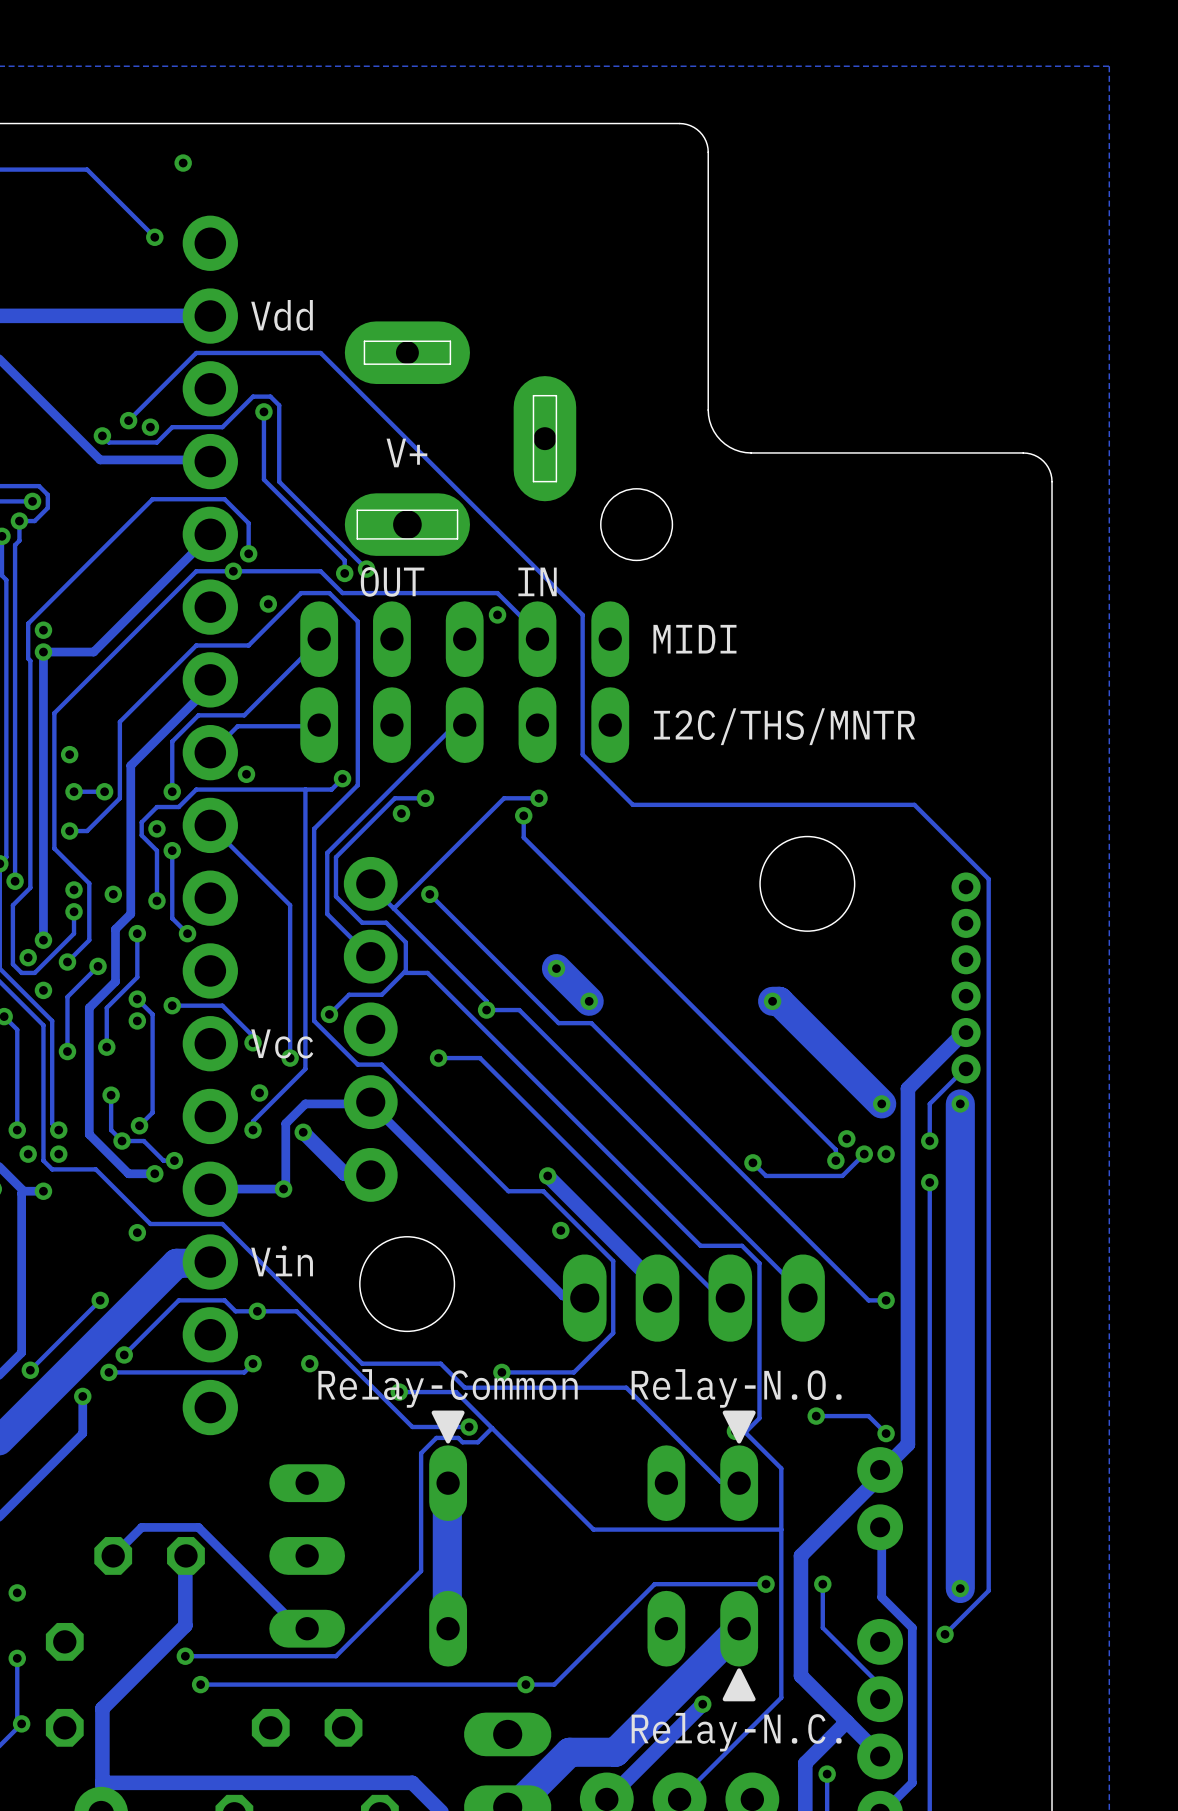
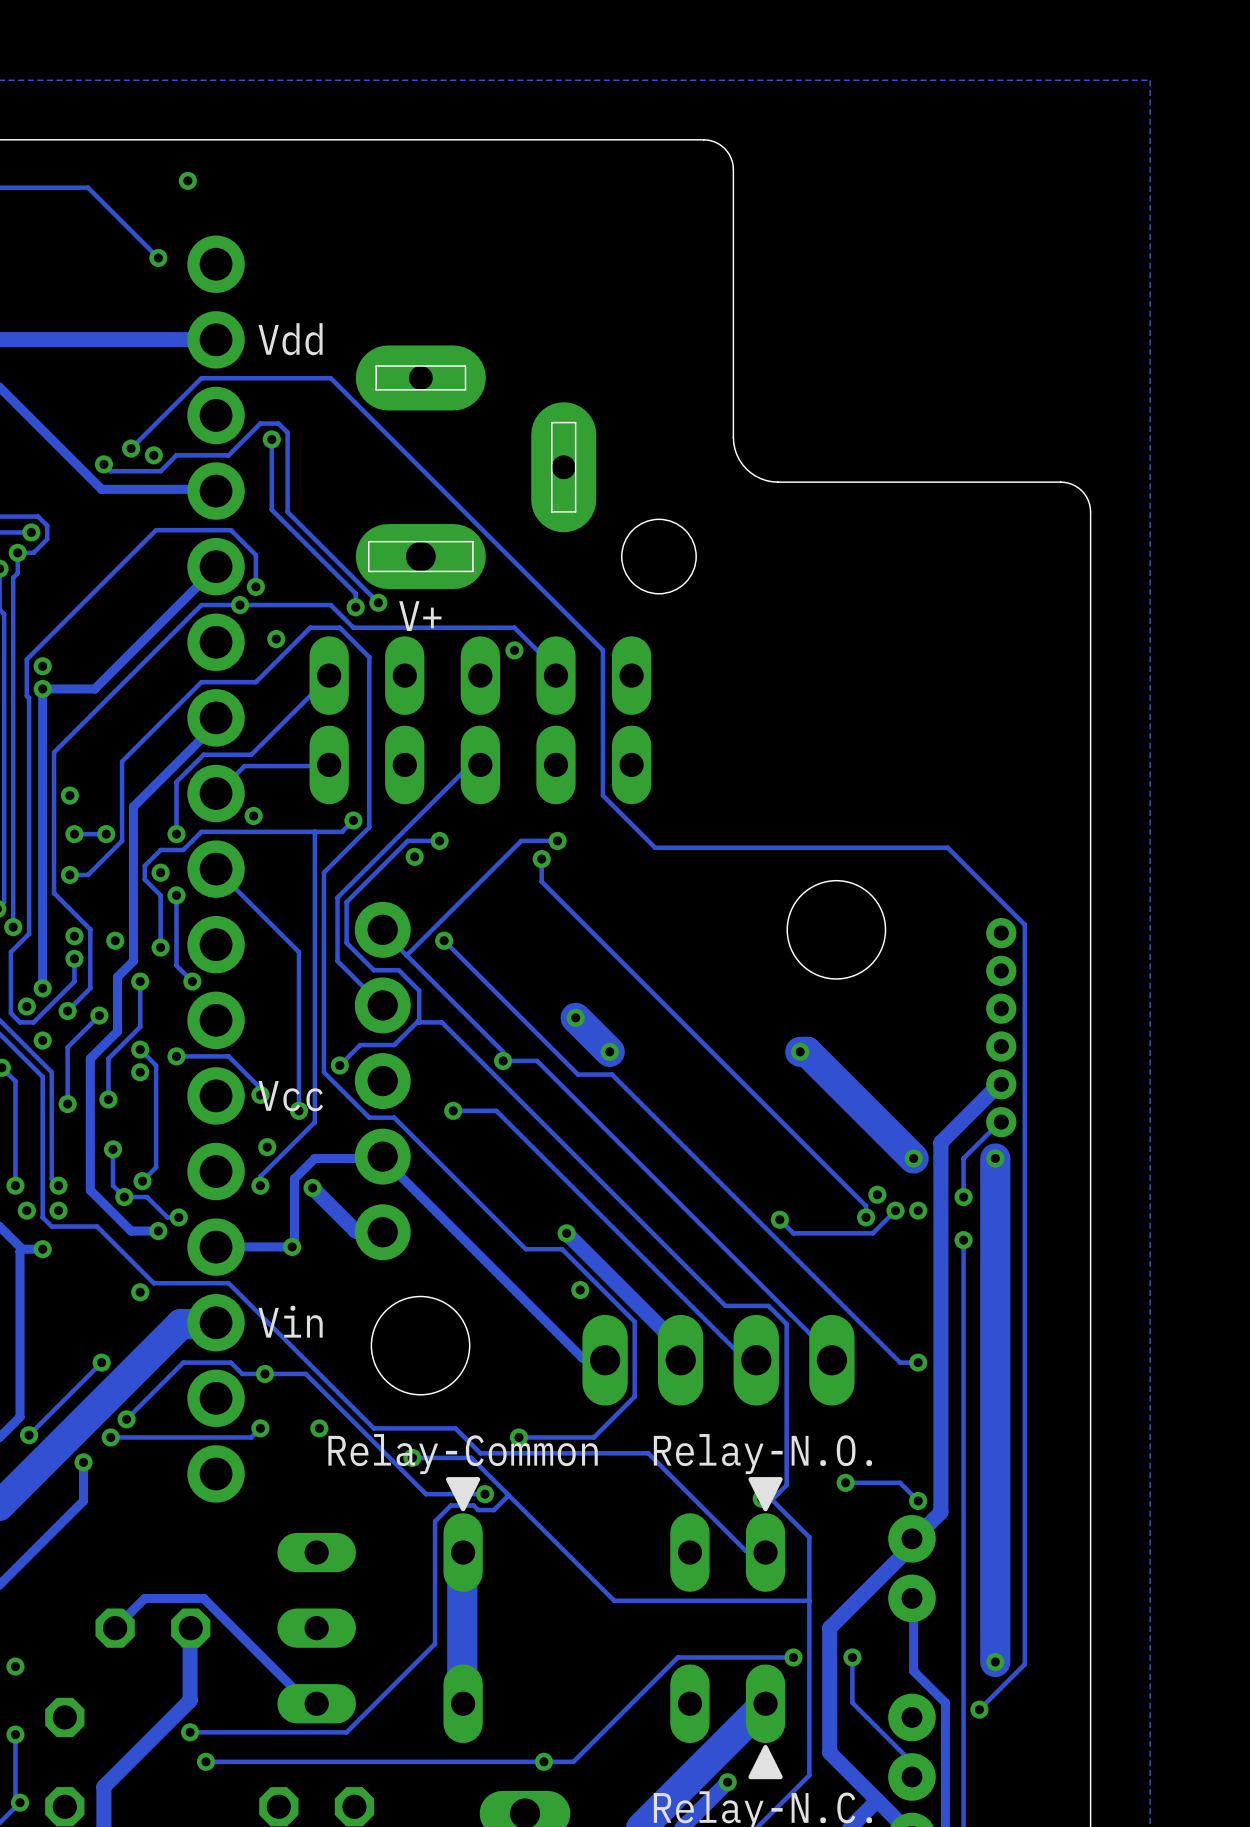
text: V+ (406, 452) -> none
text: OUT (392, 581) -> V+ (420, 616)
text: IN (537, 581) -> none
text: MIDI (694, 639) -> none
text: I2C/THS/MNTR (784, 726) -> none

